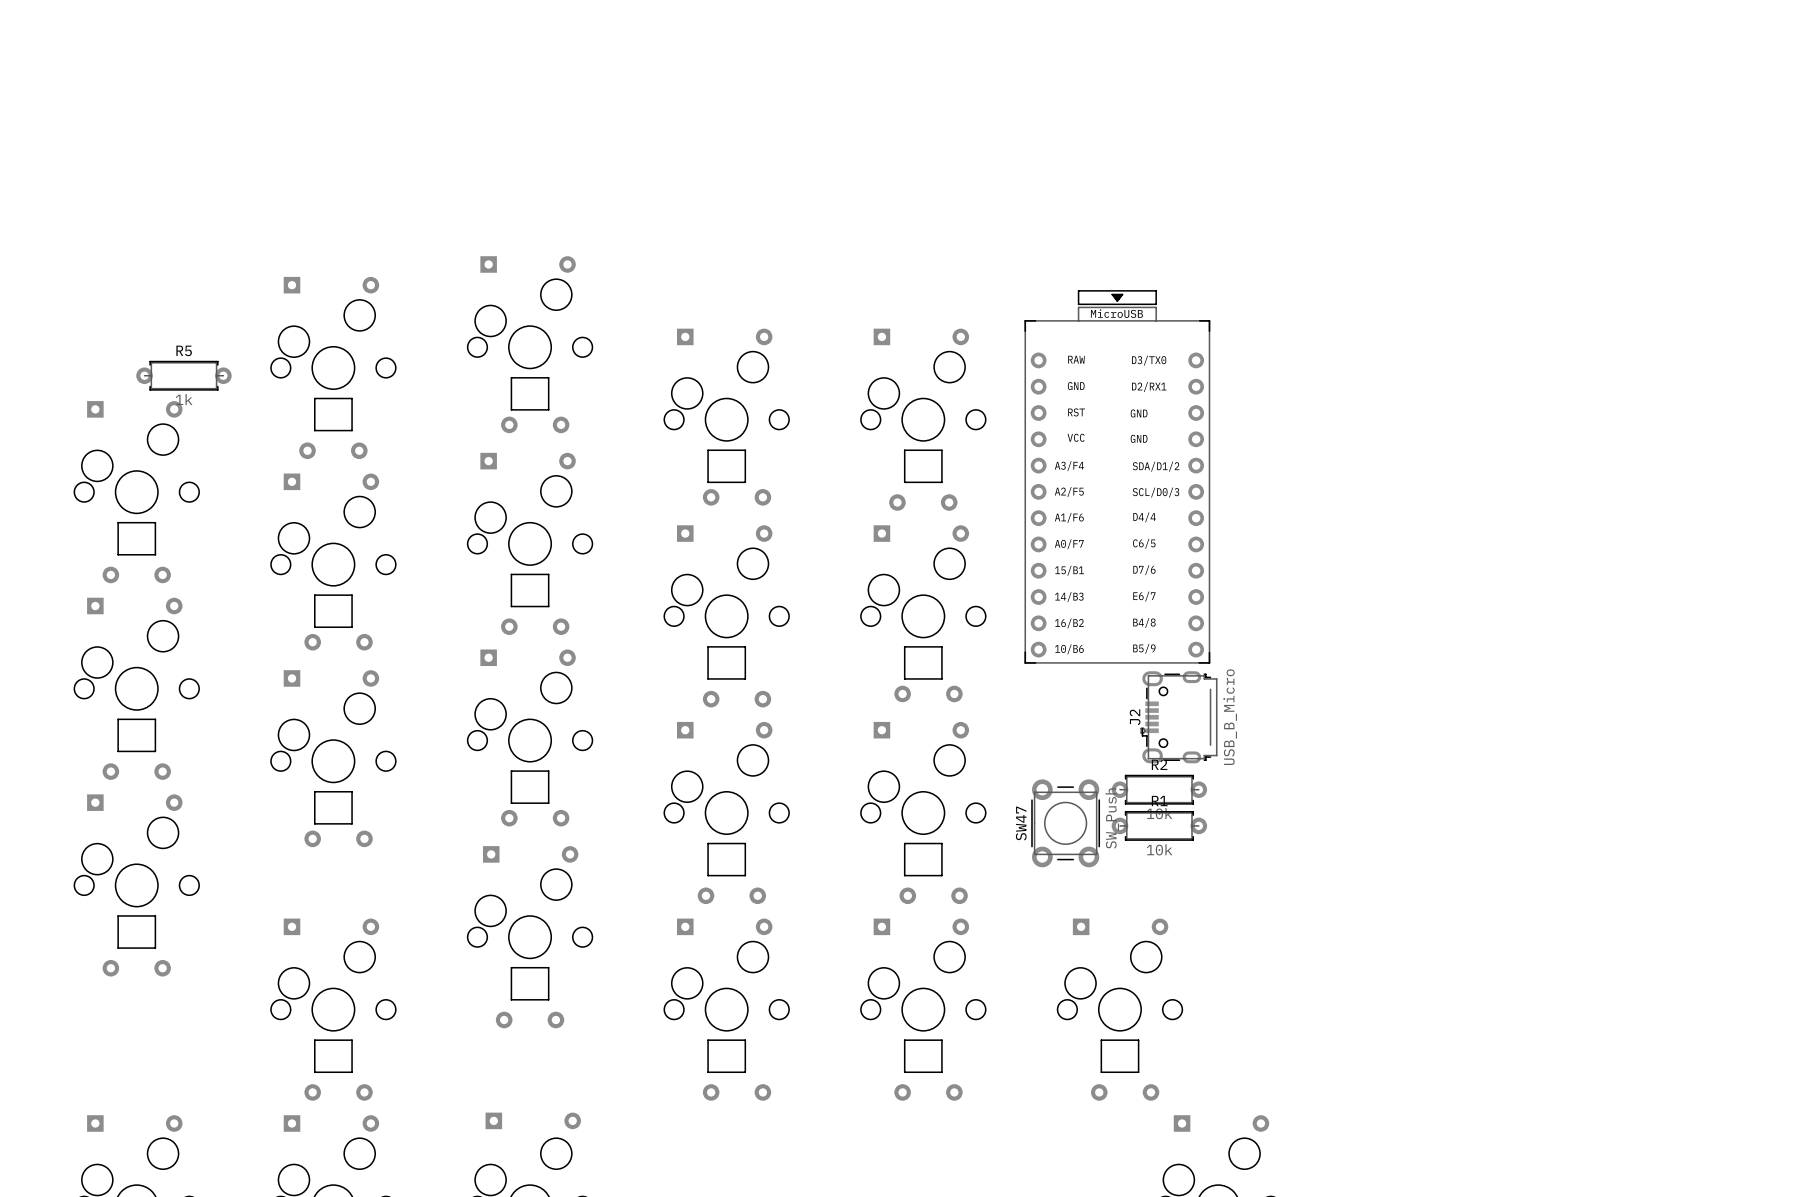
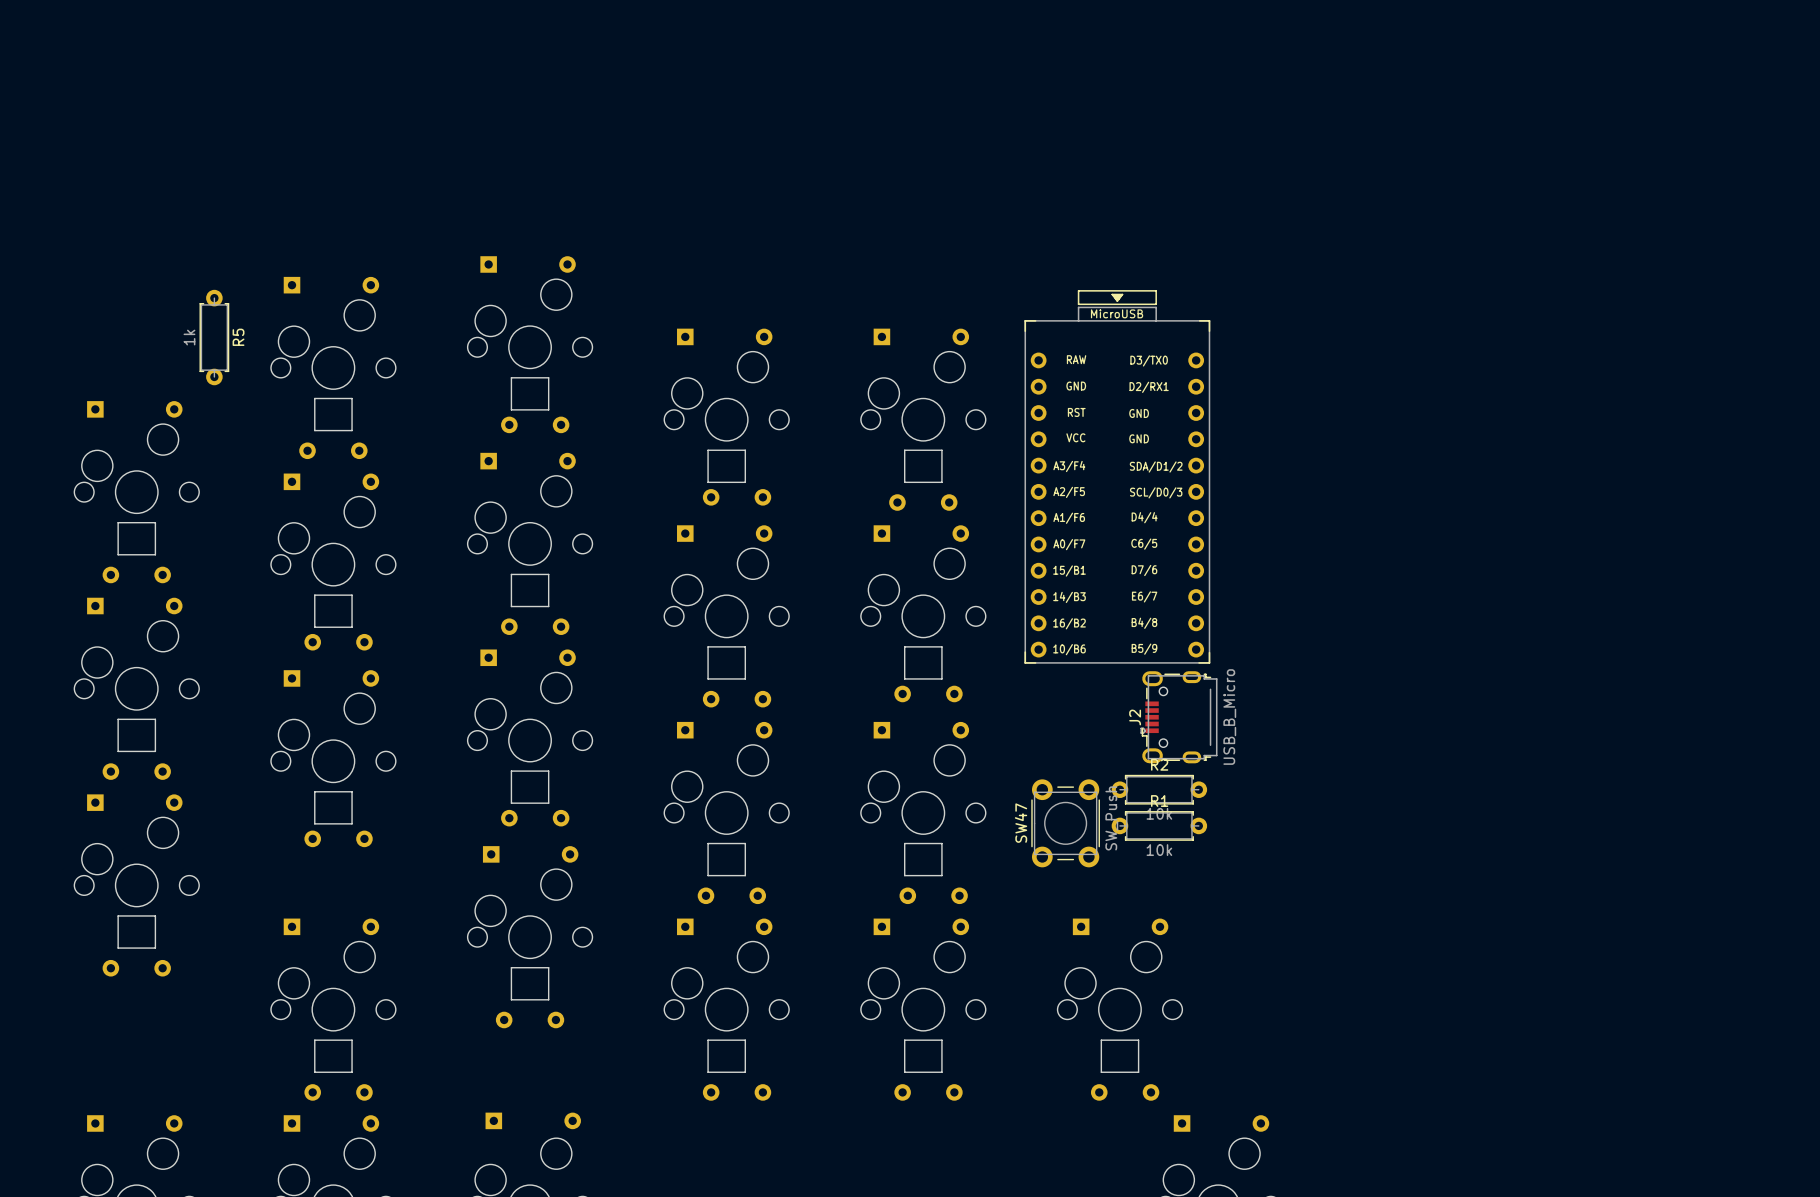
R5 rotation: 0° (183, 375) -> 90° clockwise (214, 337)

